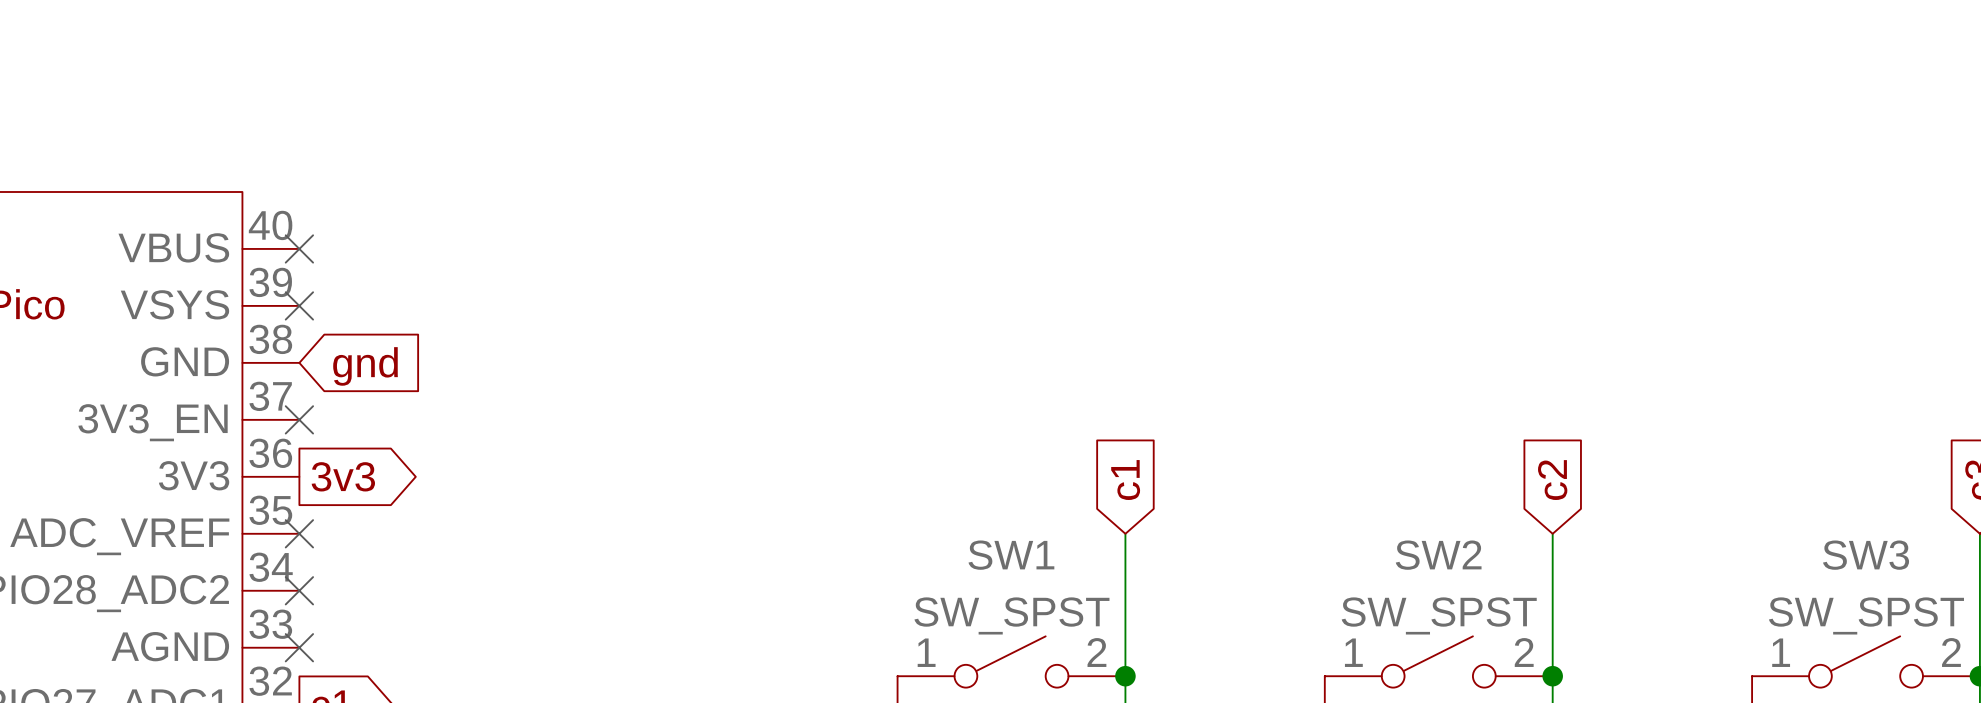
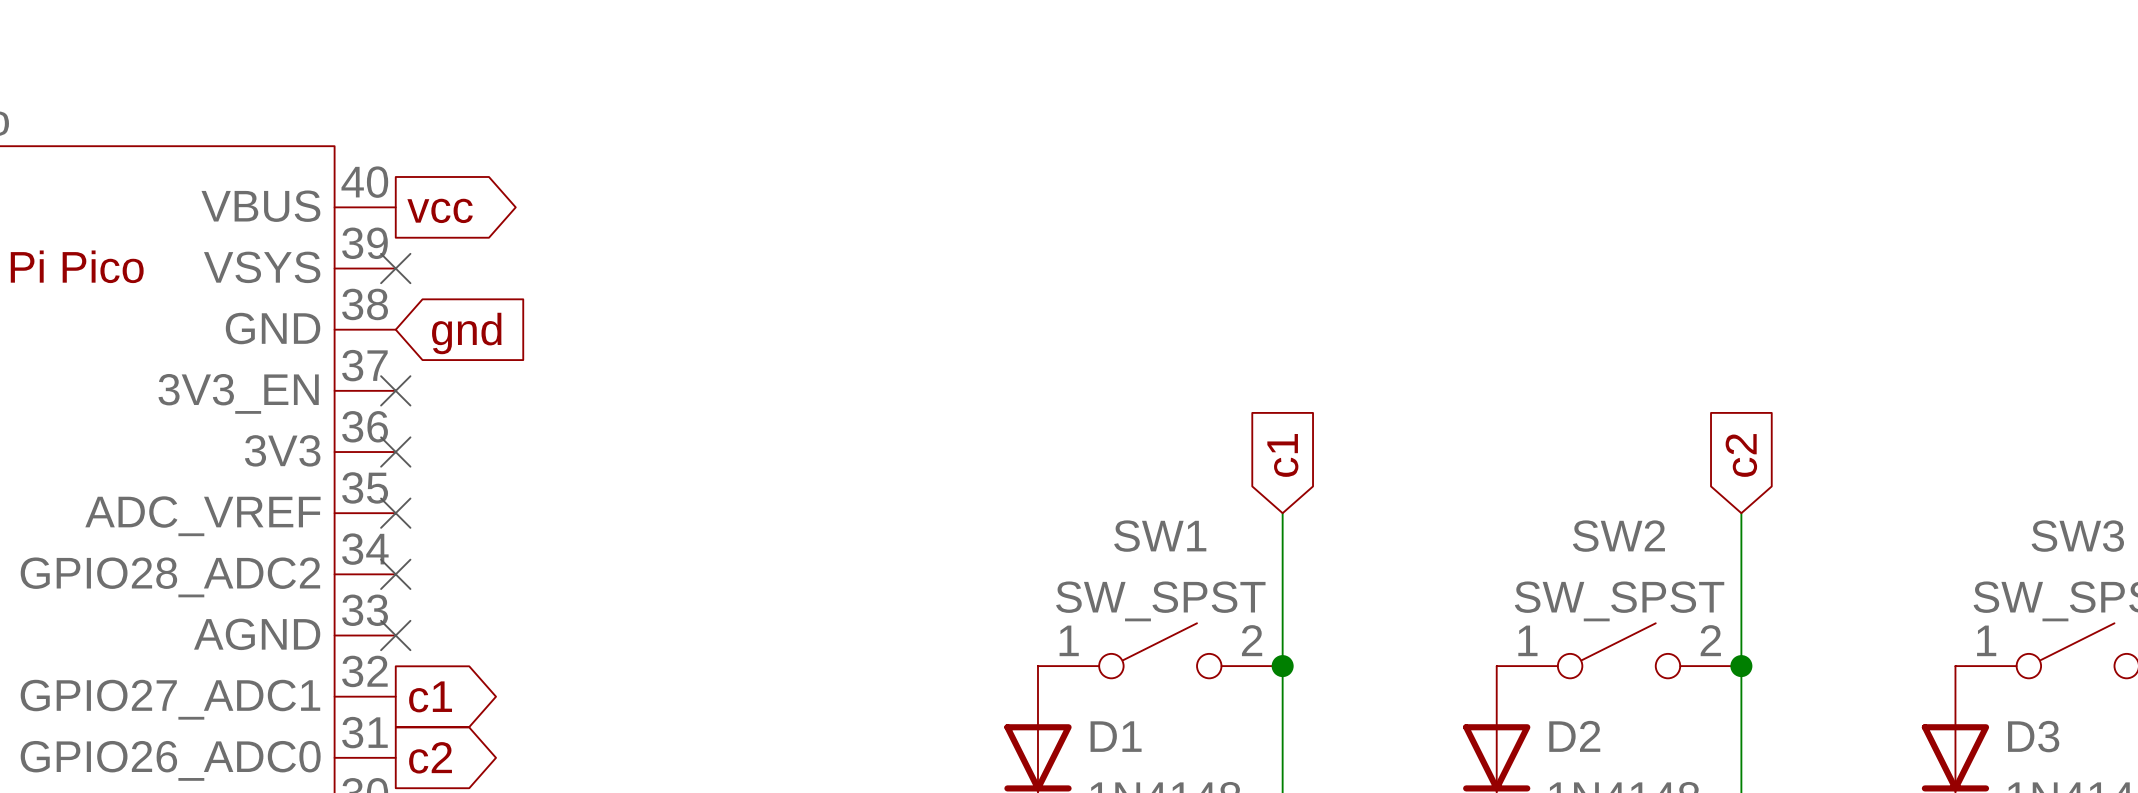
no-connect mark: (299, 248) -> none
global label: none -> vcc (440, 210)
no-connect mark: none -> (395, 452)
global label: 3v3 (343, 476) -> none

